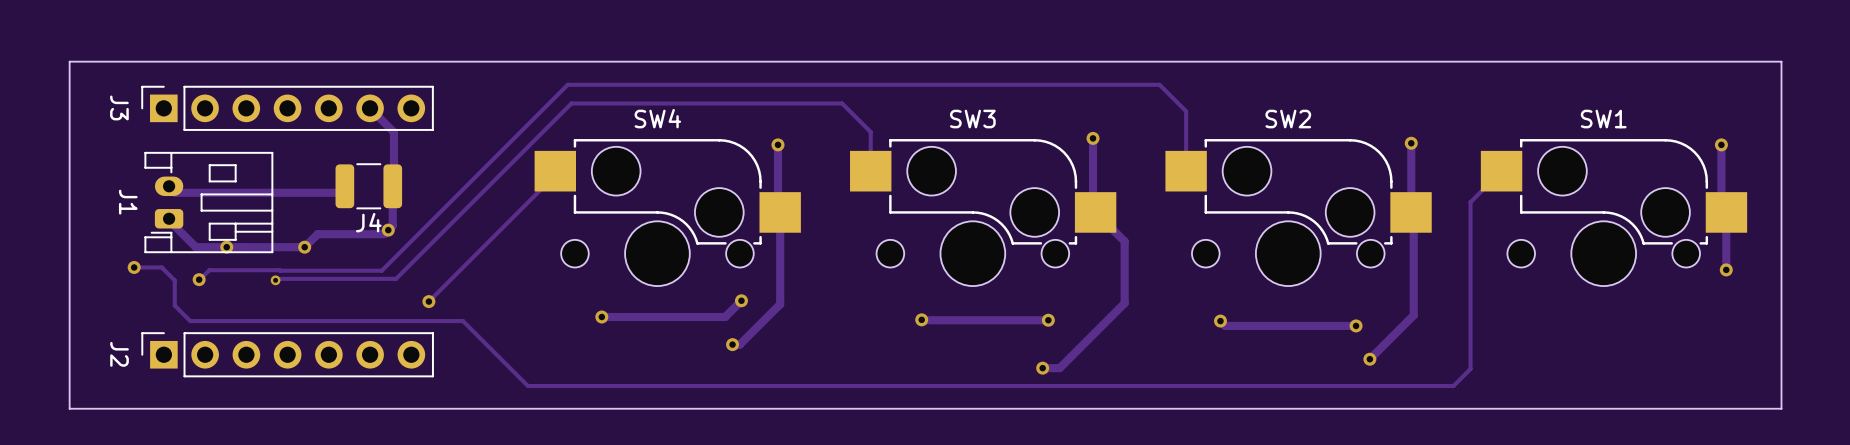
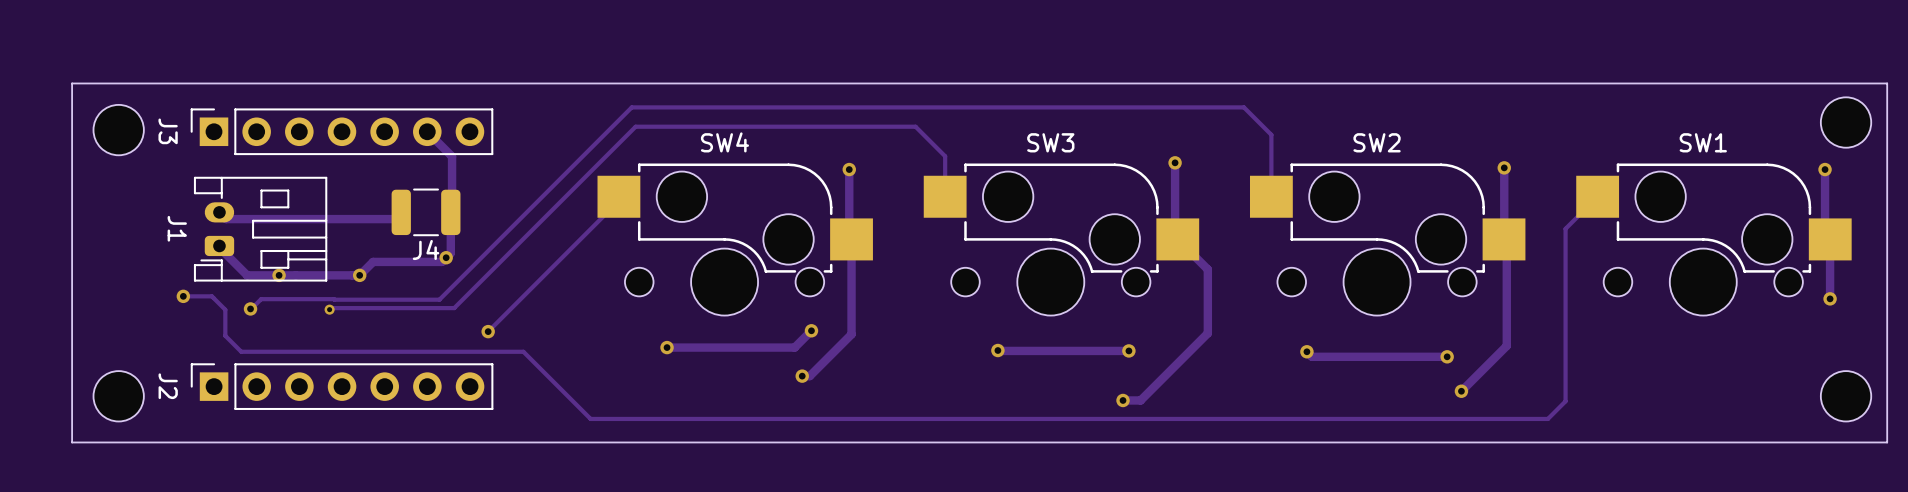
board edge: (69, 61) (69, 408) -> (116, 83) (72, 83) (72, 442) (116, 442)
part: none -> (1846, 122)
part: none -> (118, 130)
part: none -> (118, 396)
part: none -> (1846, 396)

